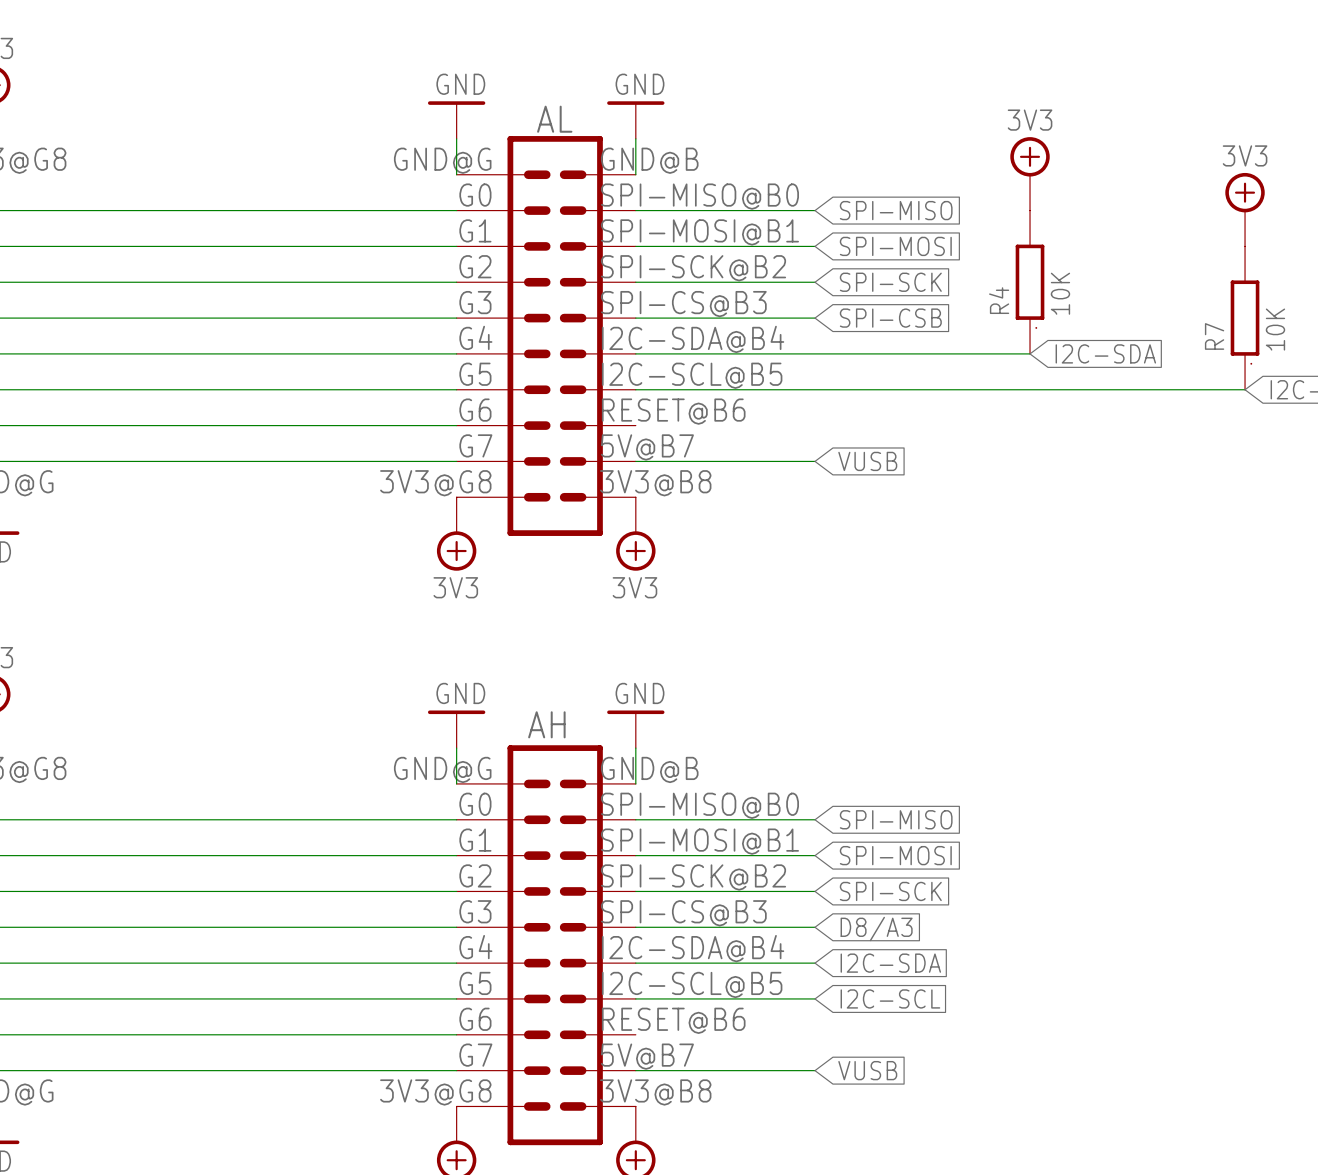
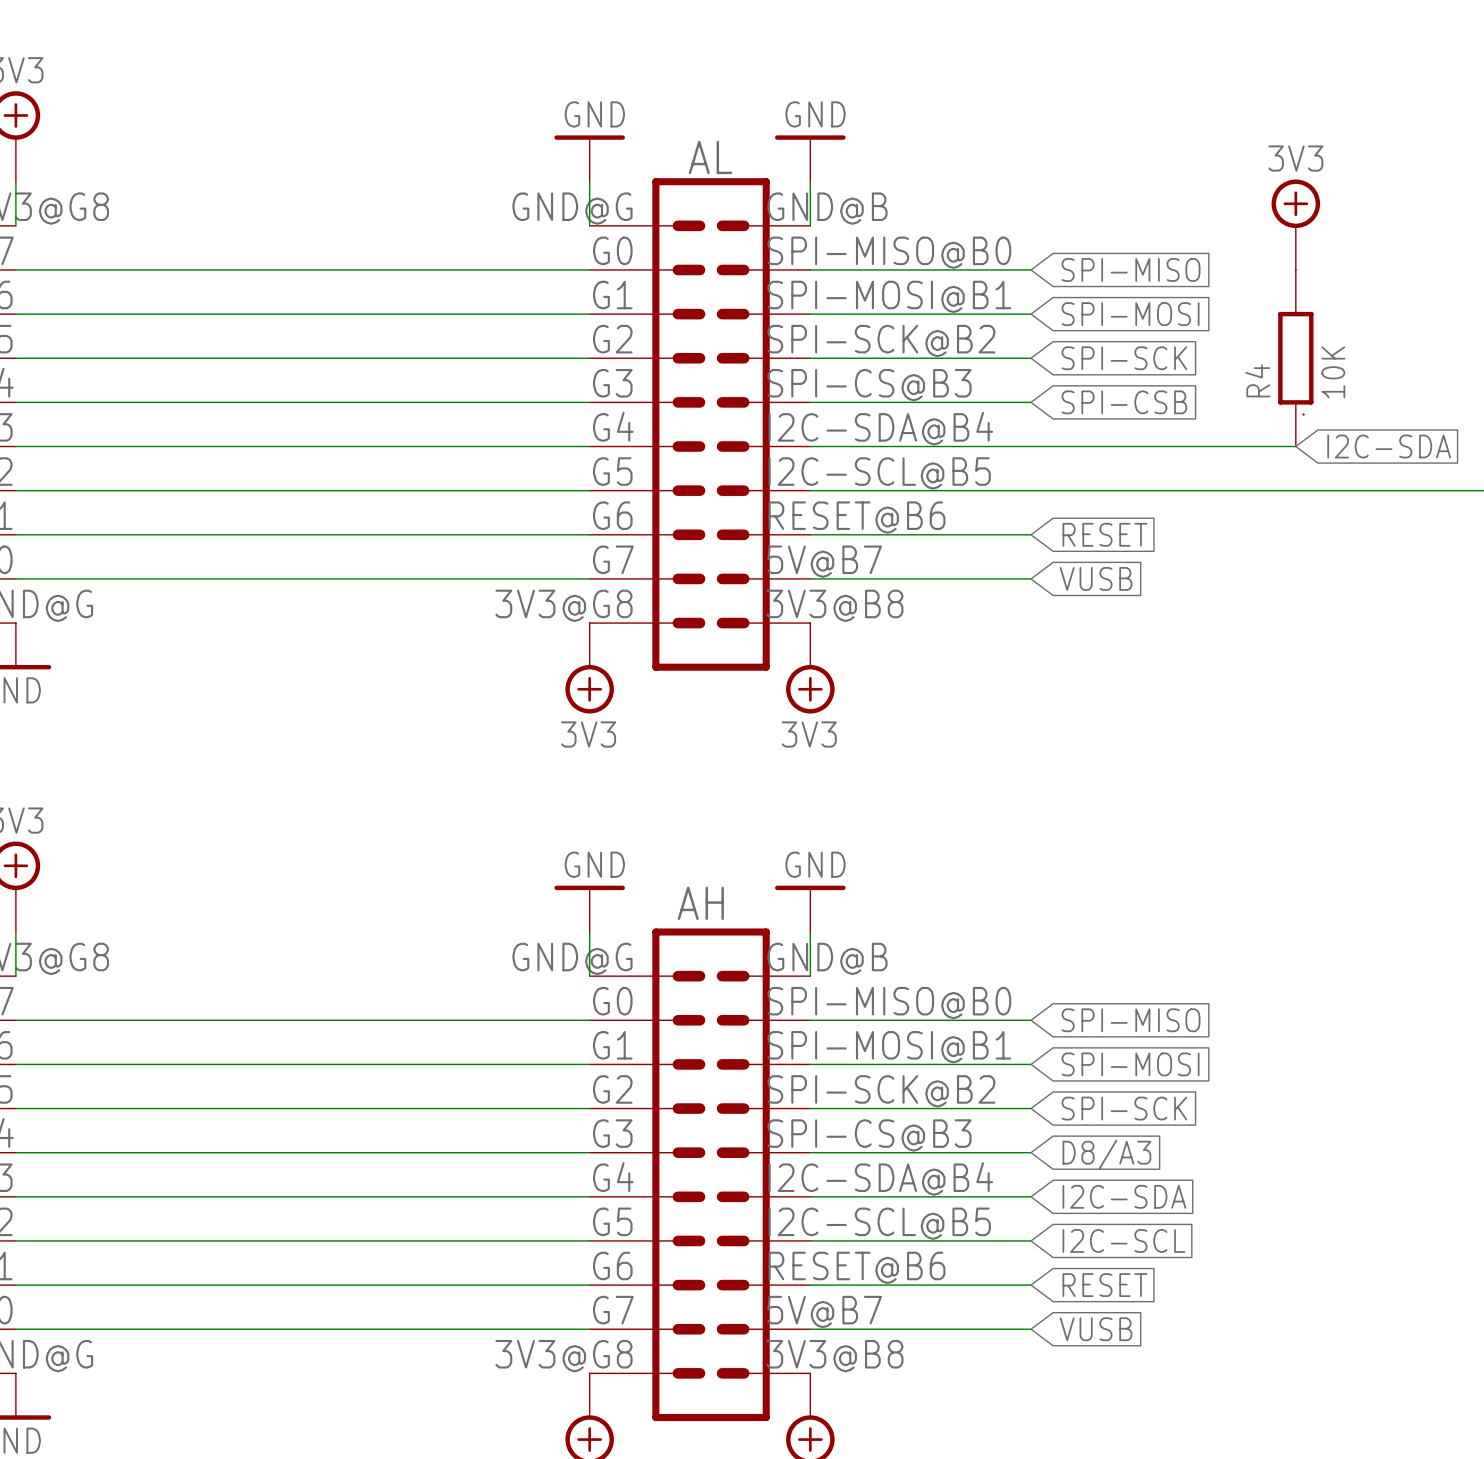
wire: none -> (810, 534) (1031, 534)
global label: none -> RESET (1105, 534)
wire: none -> (810, 1285) (1031, 1285)
global label: none -> RESET (1105, 1285)

